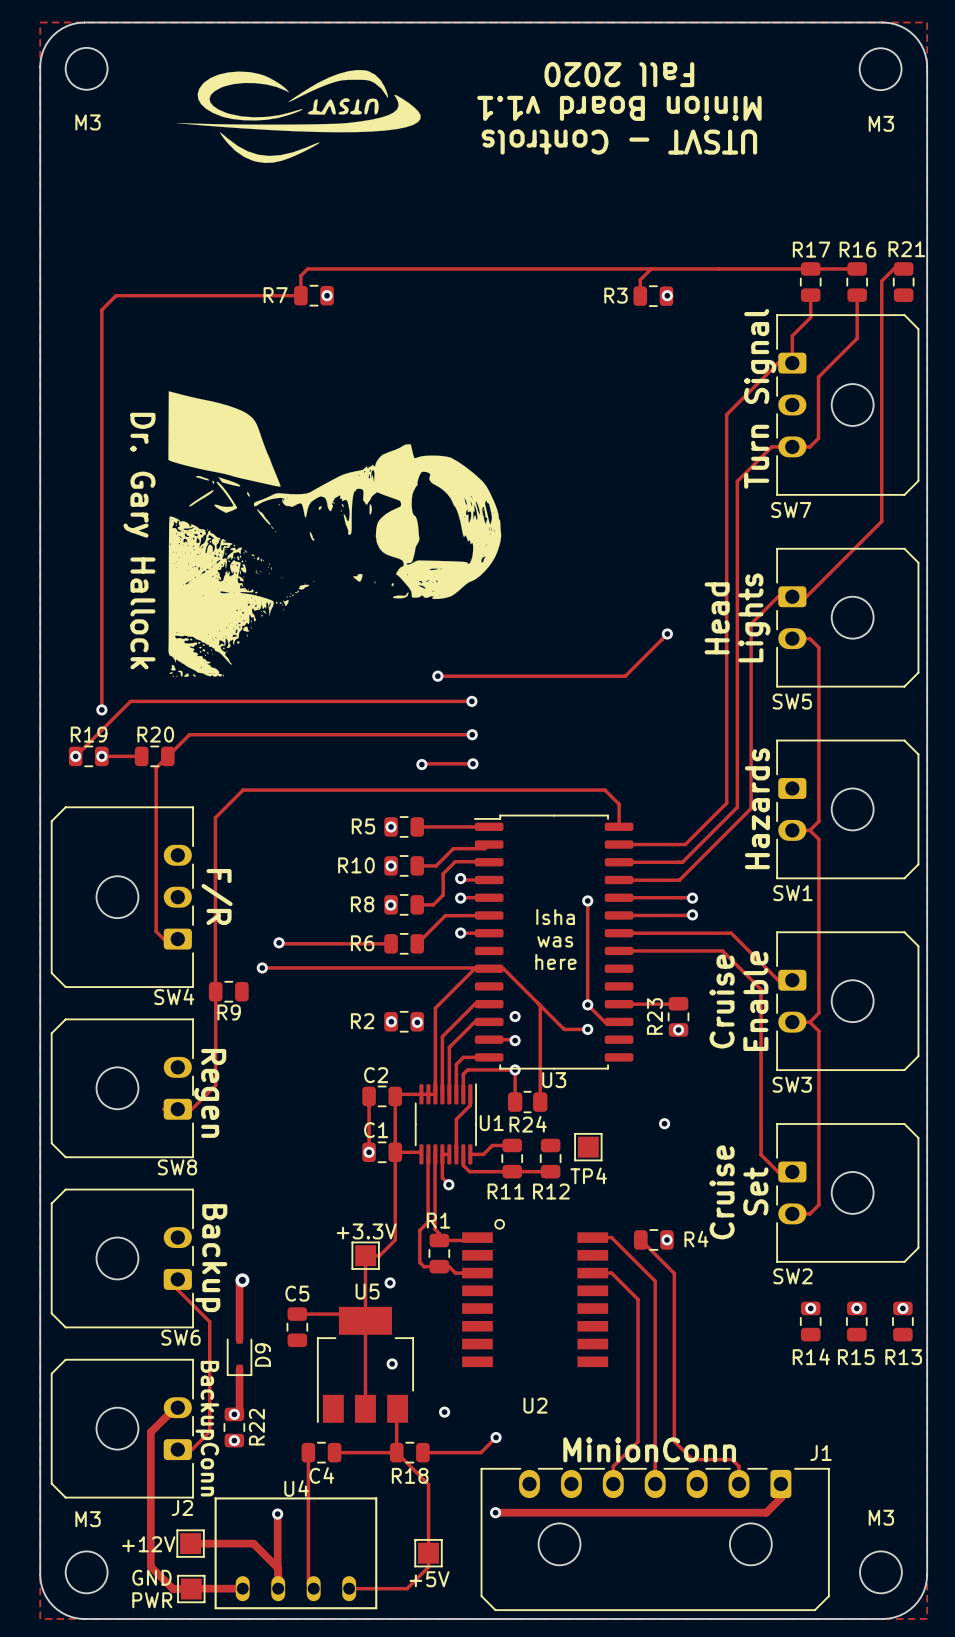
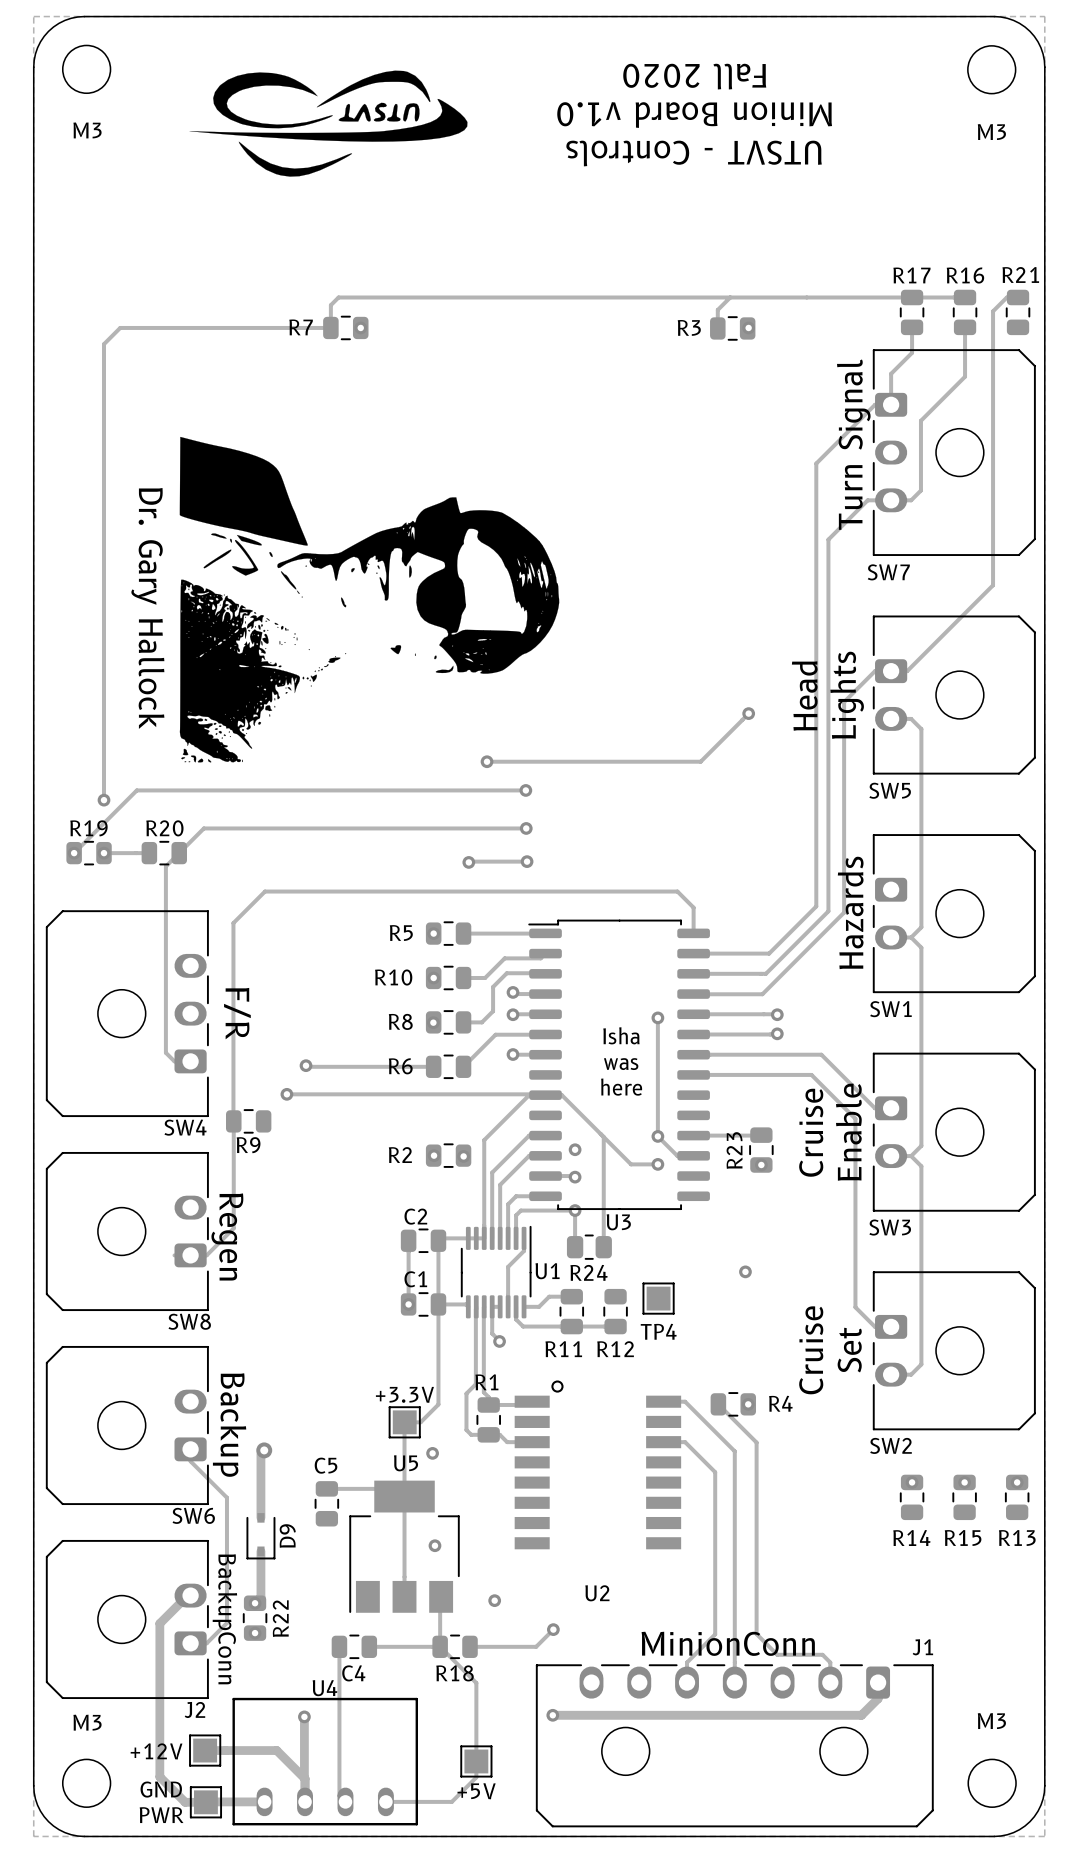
text: Minion Board v1.1 (619, 108) -> Minion Board v1.0 (694, 115)

